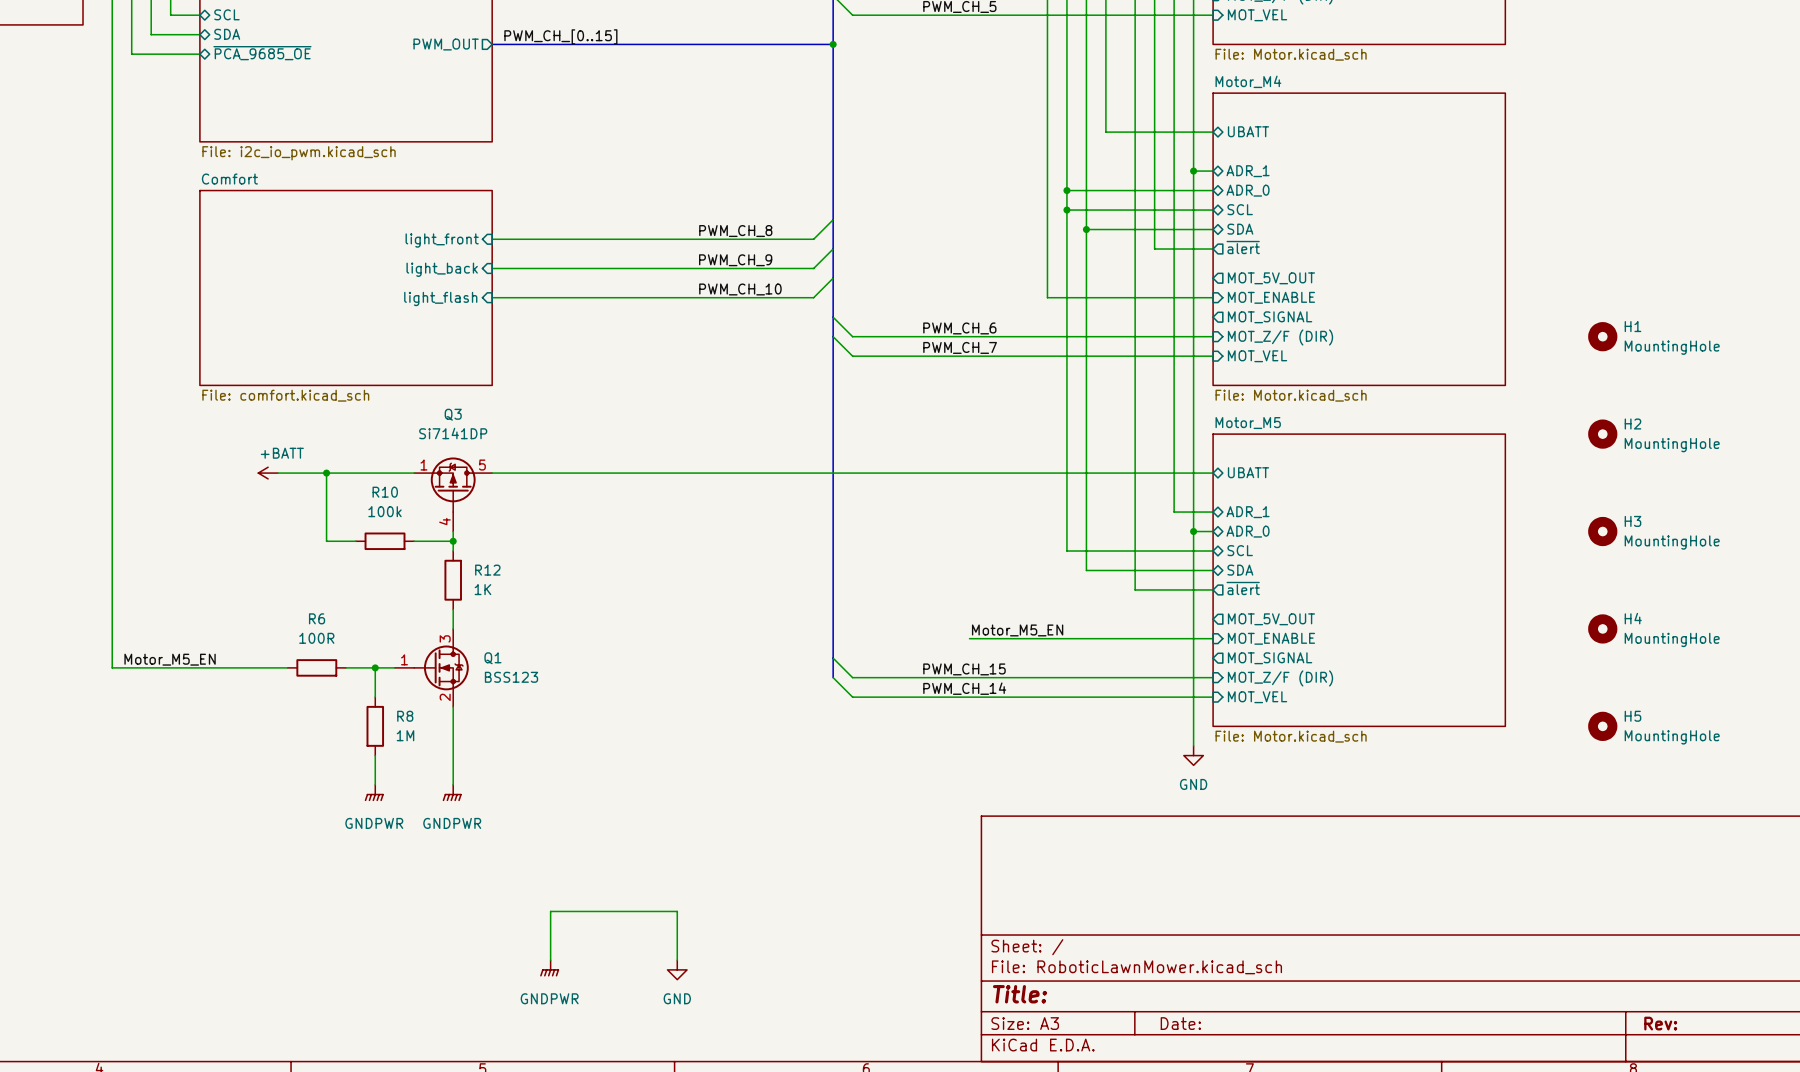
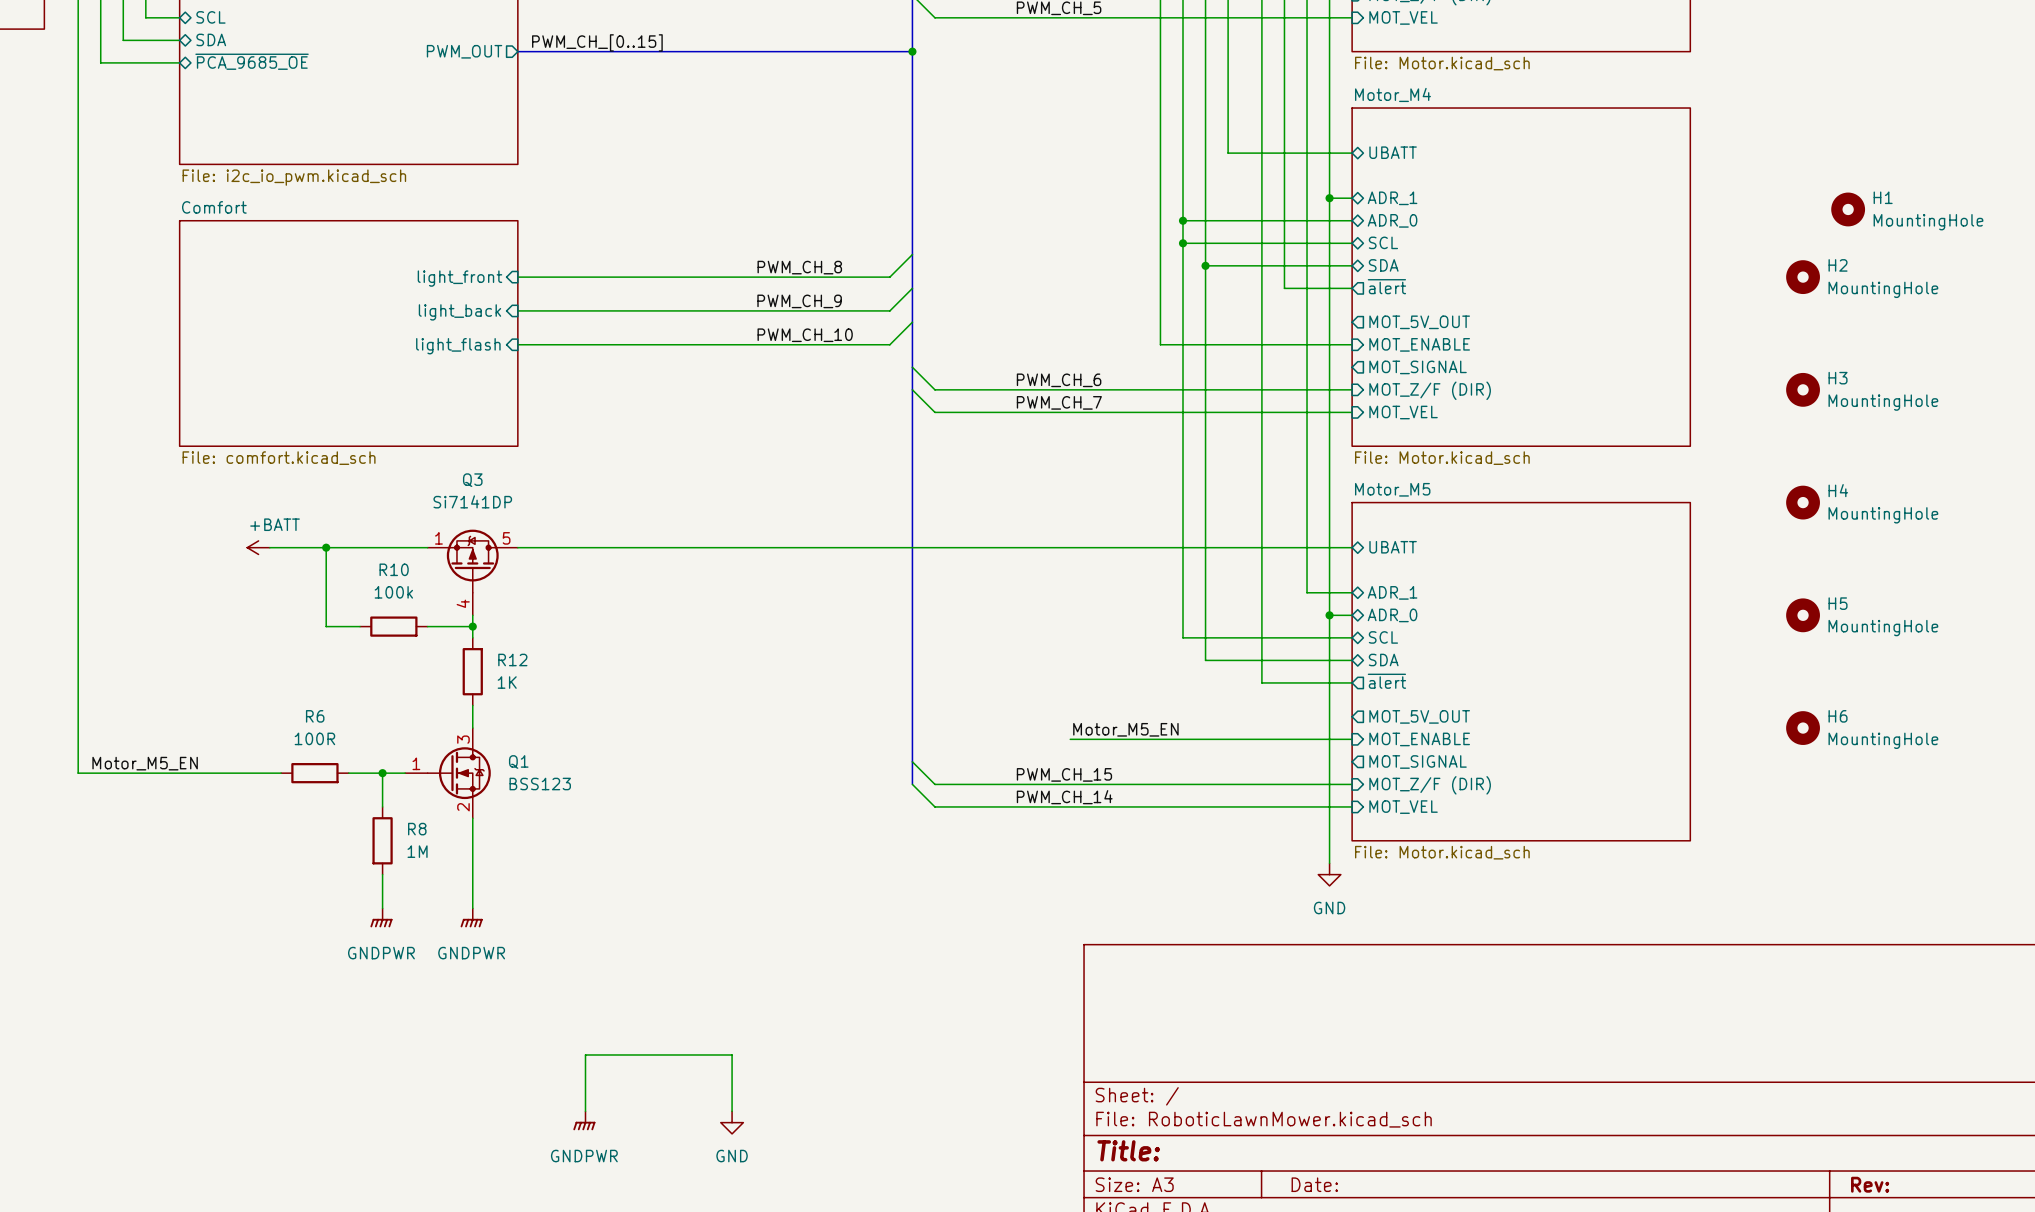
H1: none -> MountingHole (1848, 209)
H2: none -> MountingHole (1803, 277)
H1 name: H1 (1632, 326) -> H3 (1838, 378)
H2 name: H2 (1632, 423) -> H4 (1838, 490)
H3 name: H3 (1632, 521) -> H5 (1838, 603)
H4 name: H4 (1633, 618) -> H6 (1838, 716)
H5: MountingHole (1602, 726) -> none

